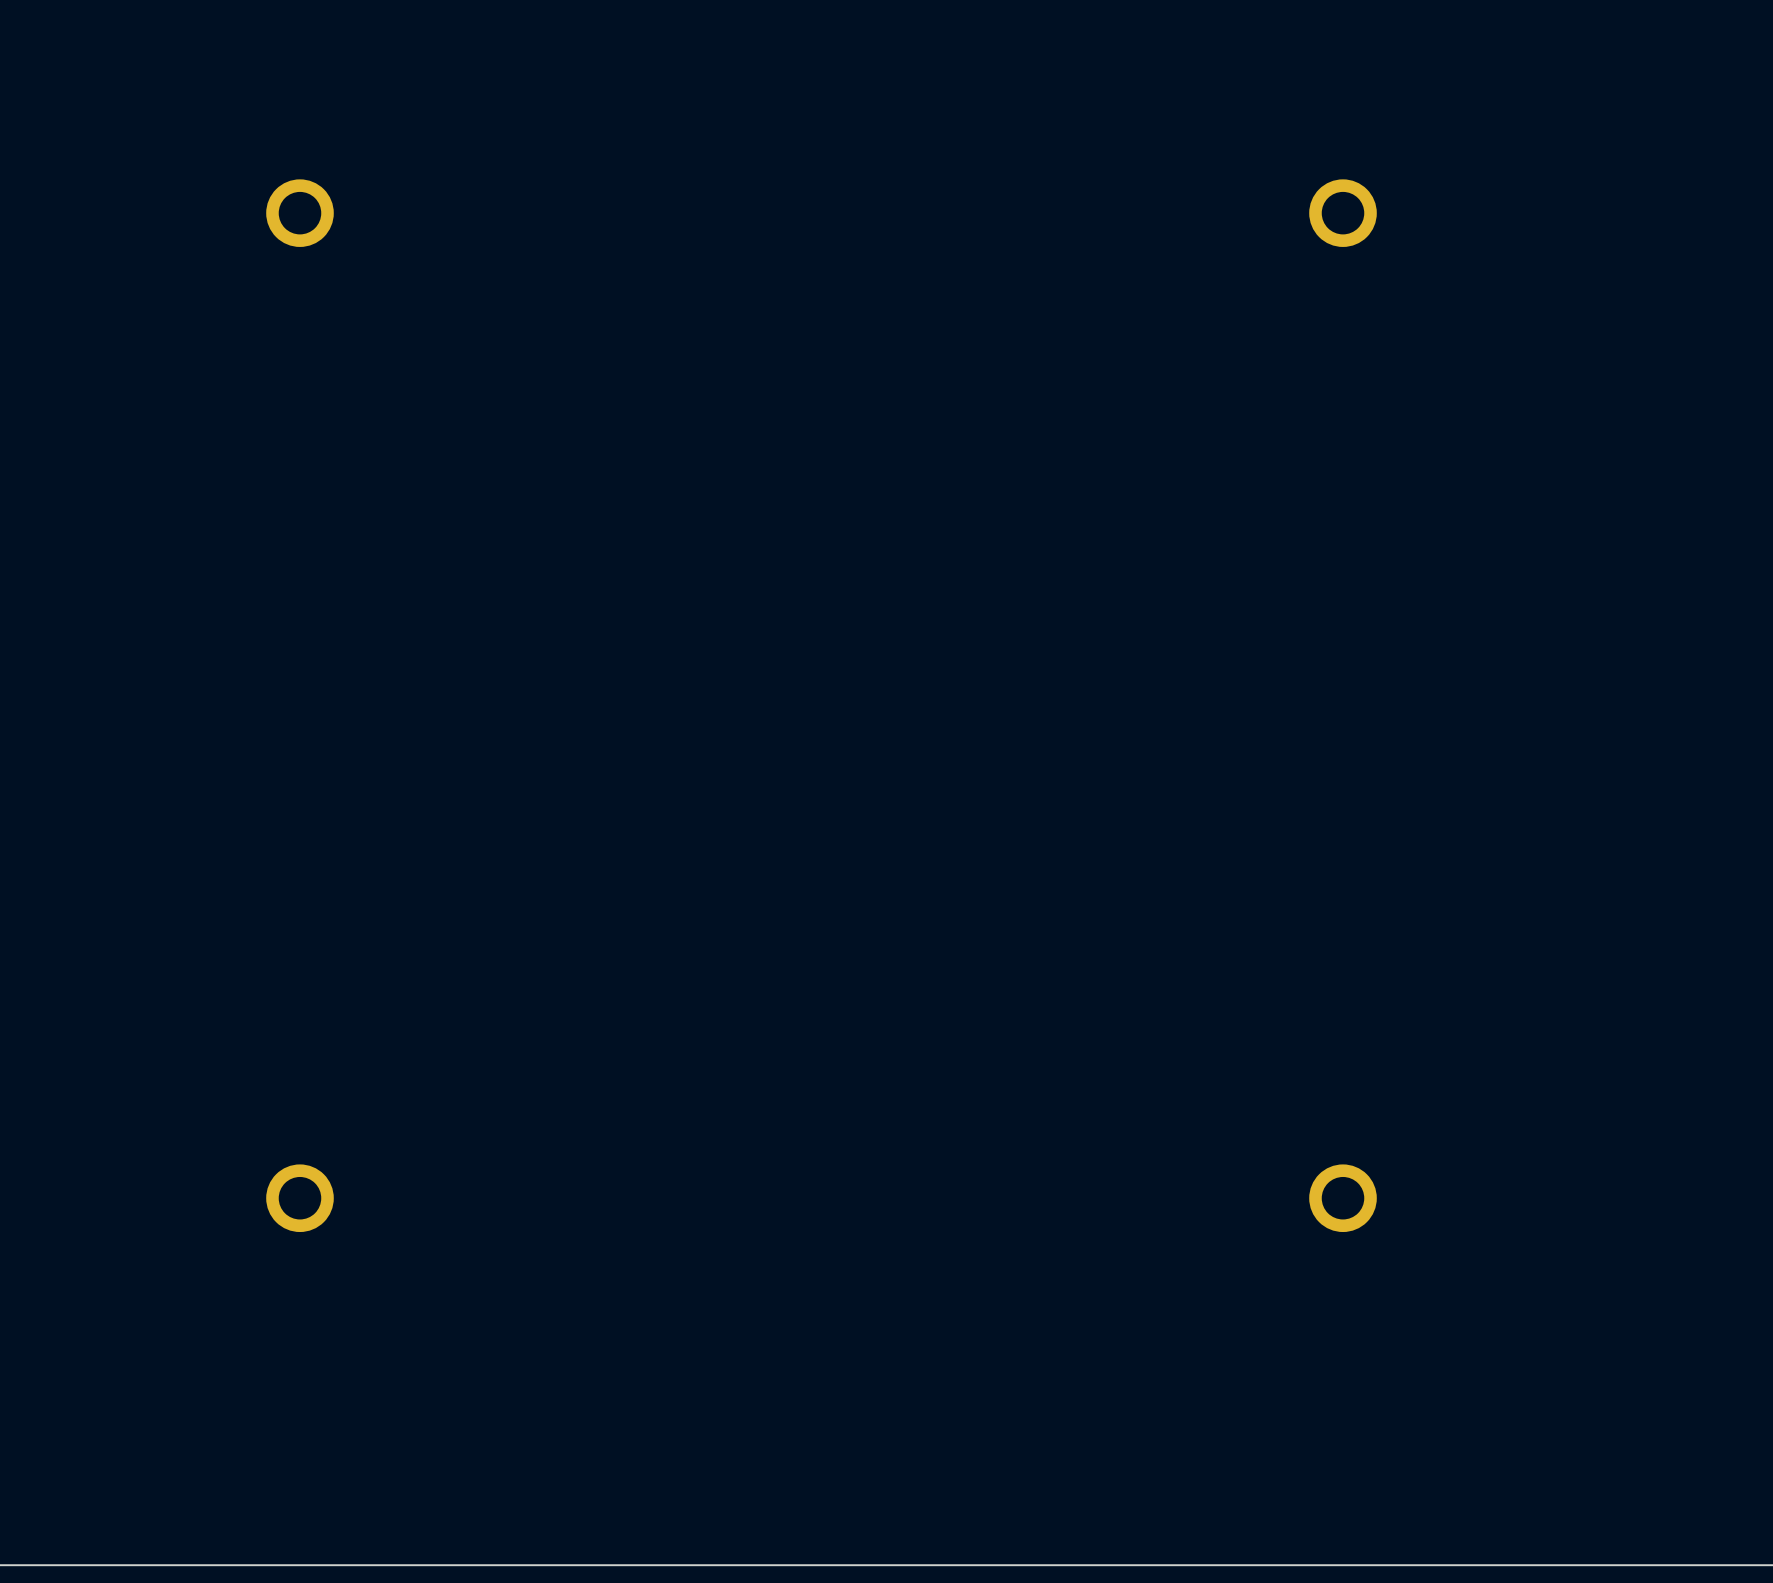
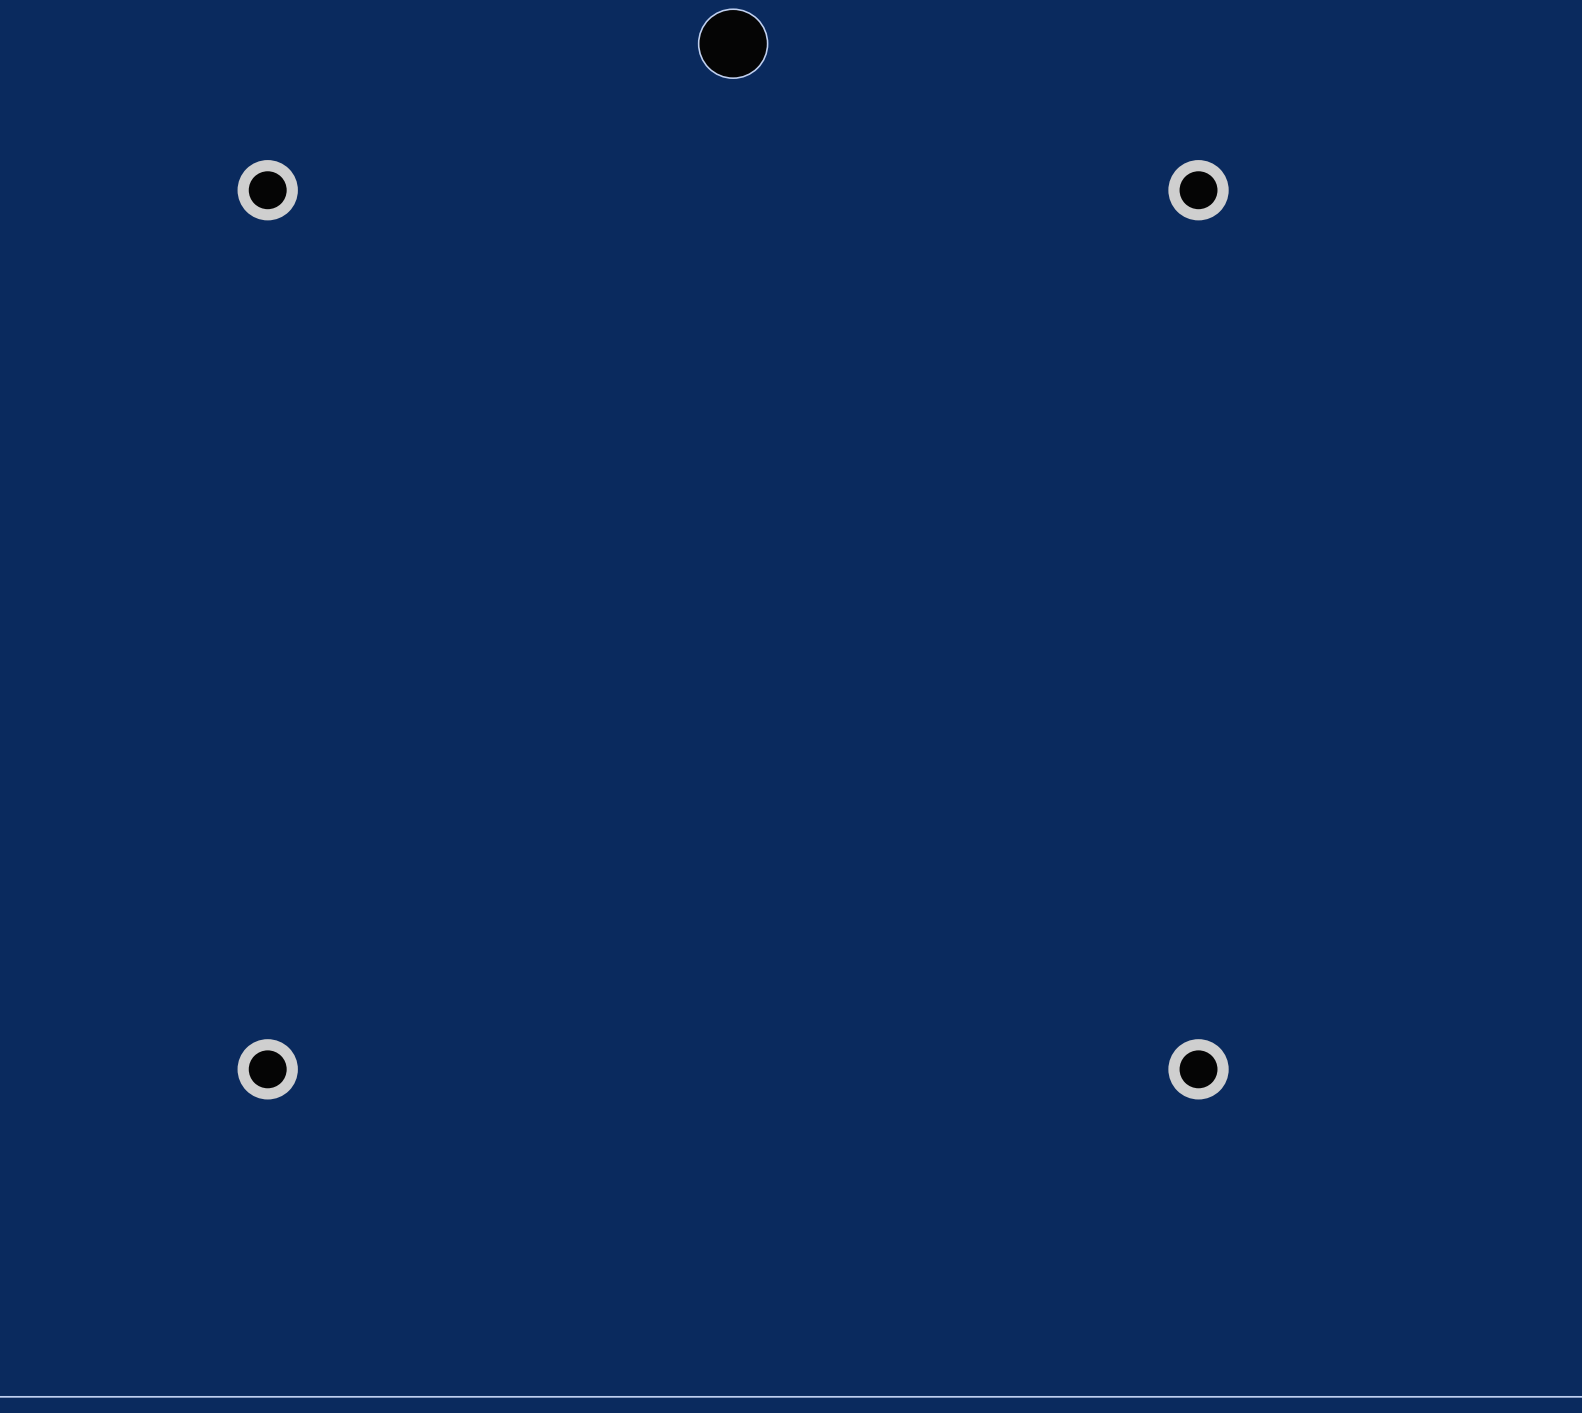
part: none -> (733, 43)

